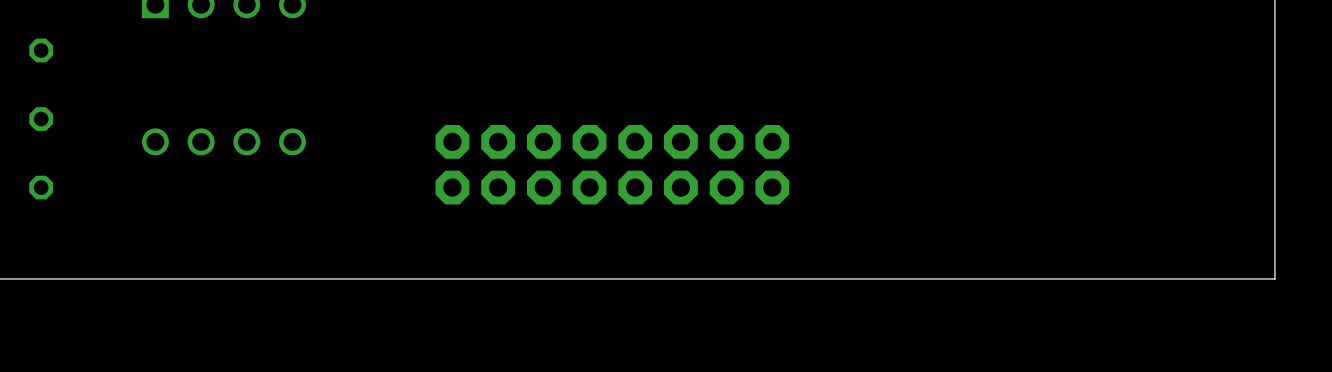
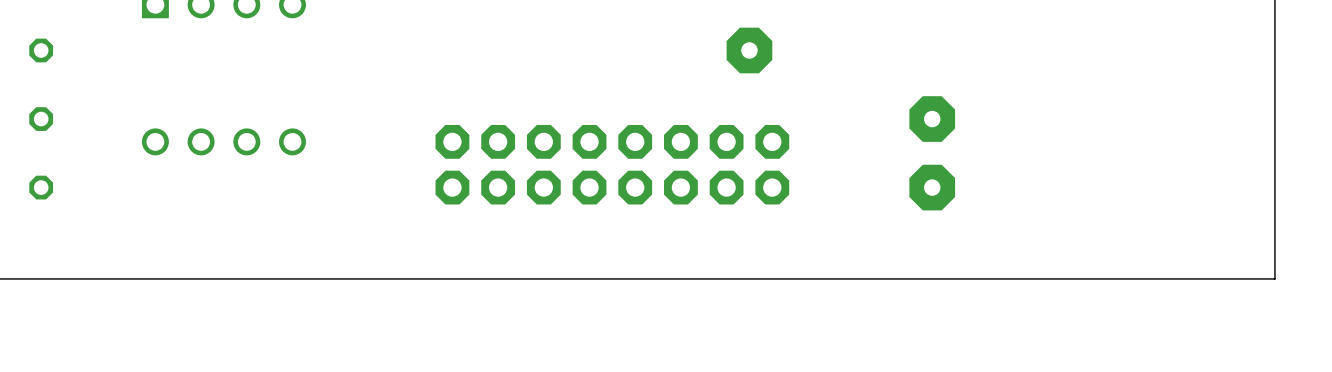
part: none -> (749, 50)
part: none -> (932, 119)
part: none -> (932, 187)

